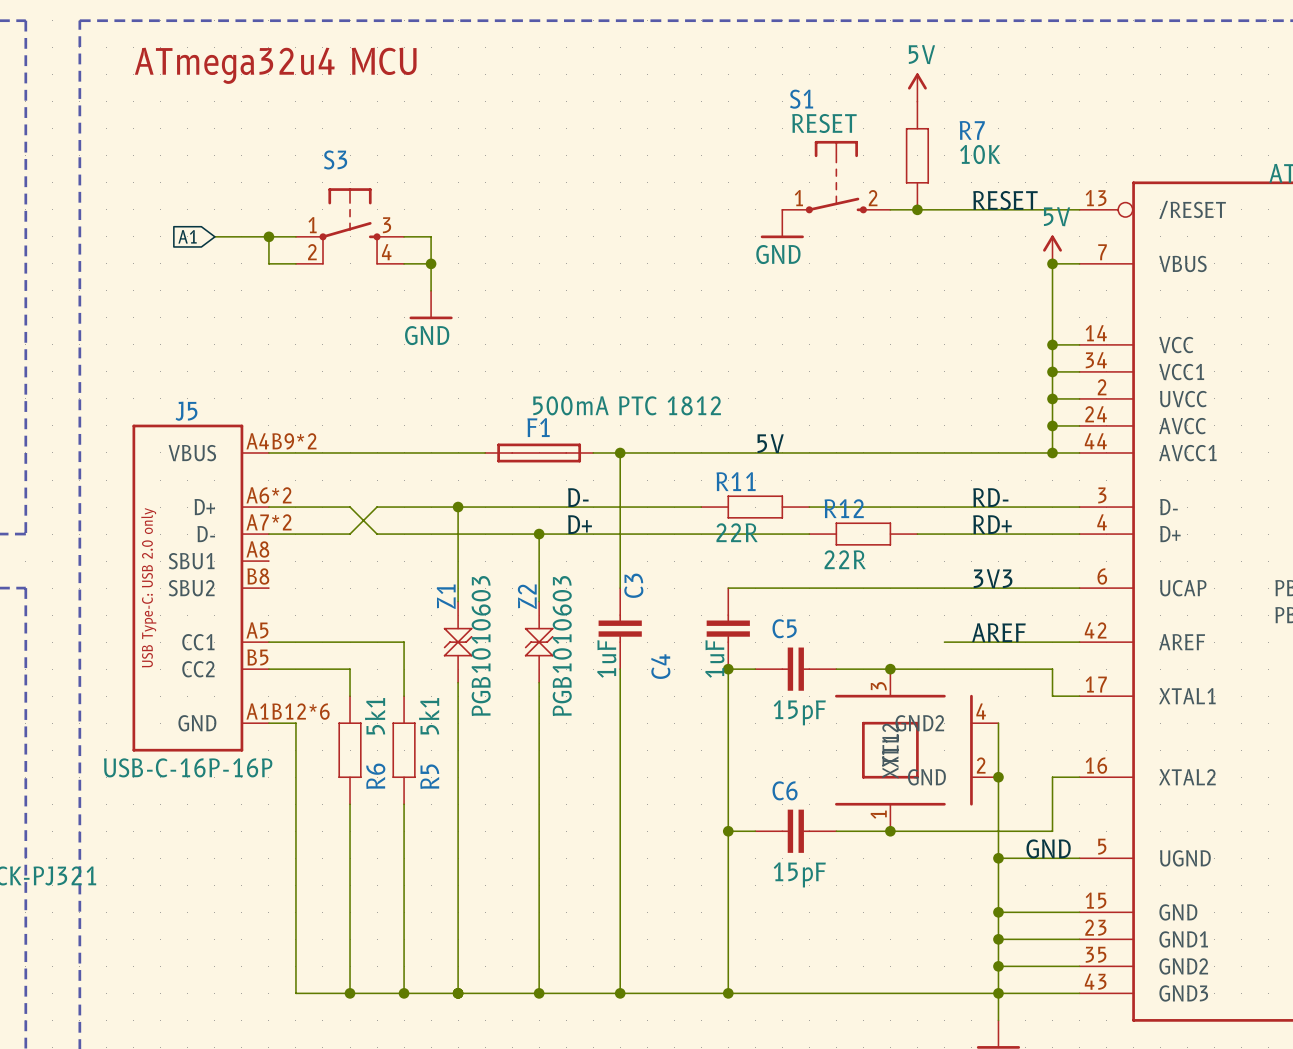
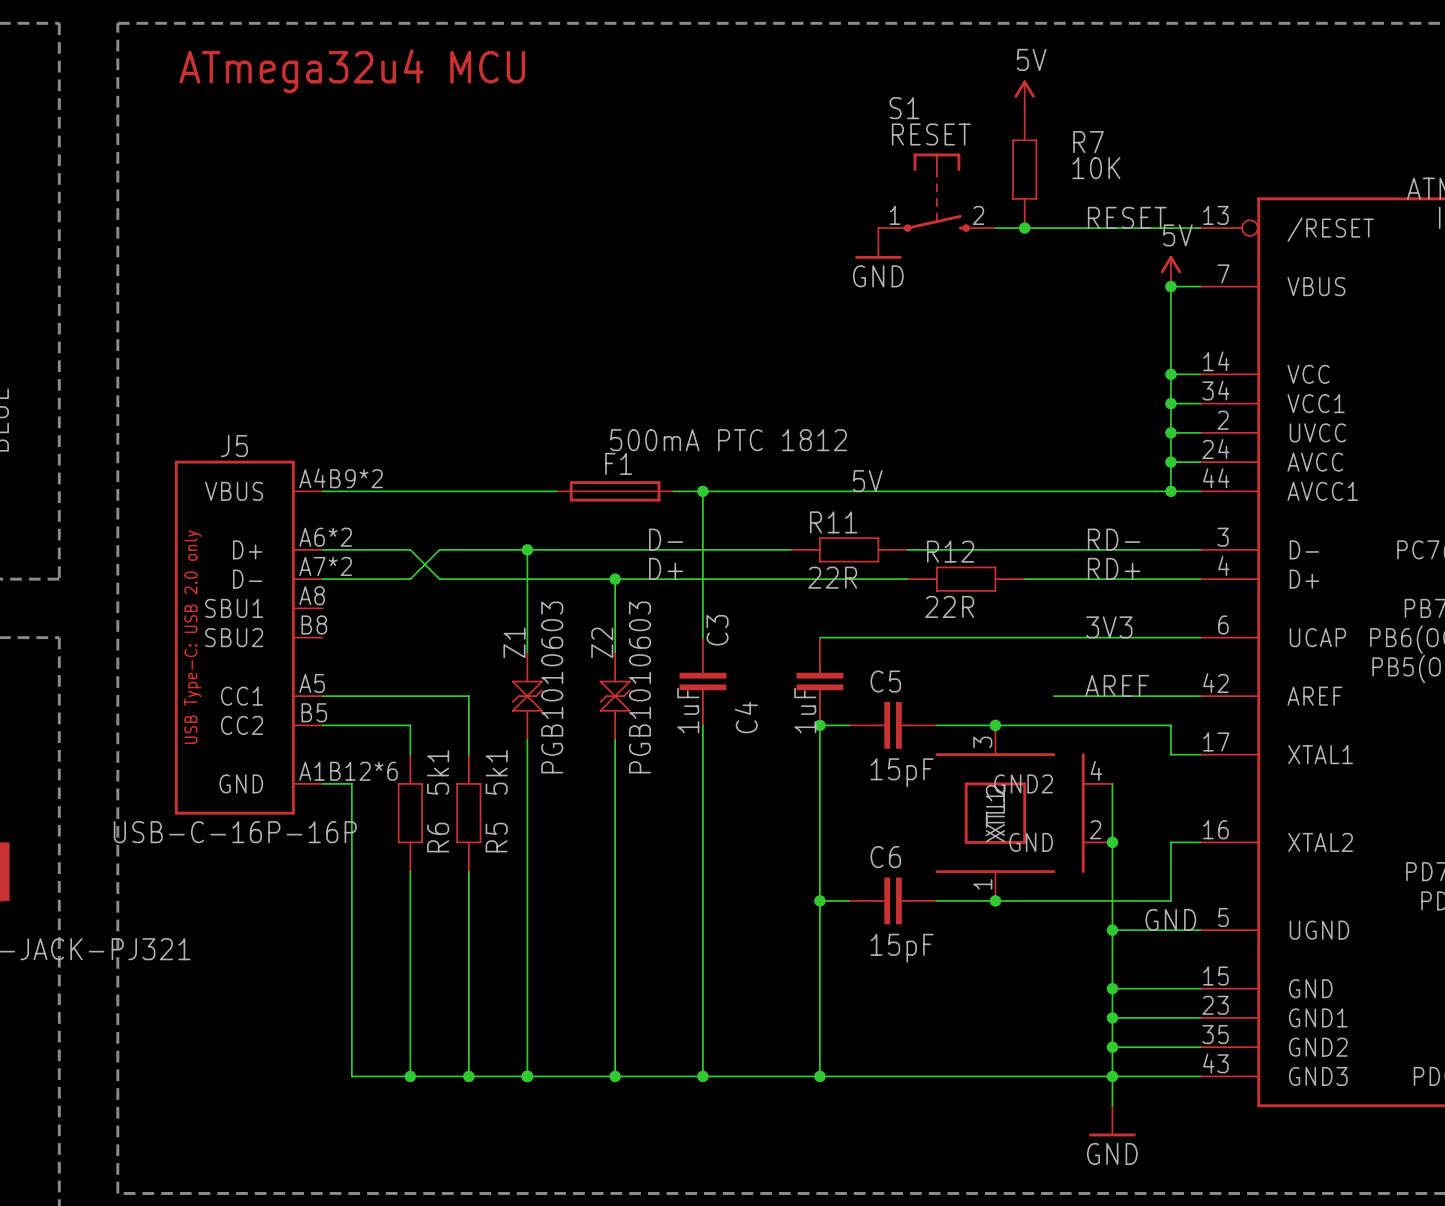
S3: (350, 226) -> none
global label: A1 (187, 236) -> none
wire: (214, 236) (295, 236) -> none
wire: (268, 236) (268, 263) (295, 263) -> none
junction: (268, 236) -> none
wire: (404, 236) (431, 236) (431, 290) -> none
wire: (404, 263) (431, 263) -> none
junction: (431, 263) -> none
power symbol: GND (431, 305) -> none

